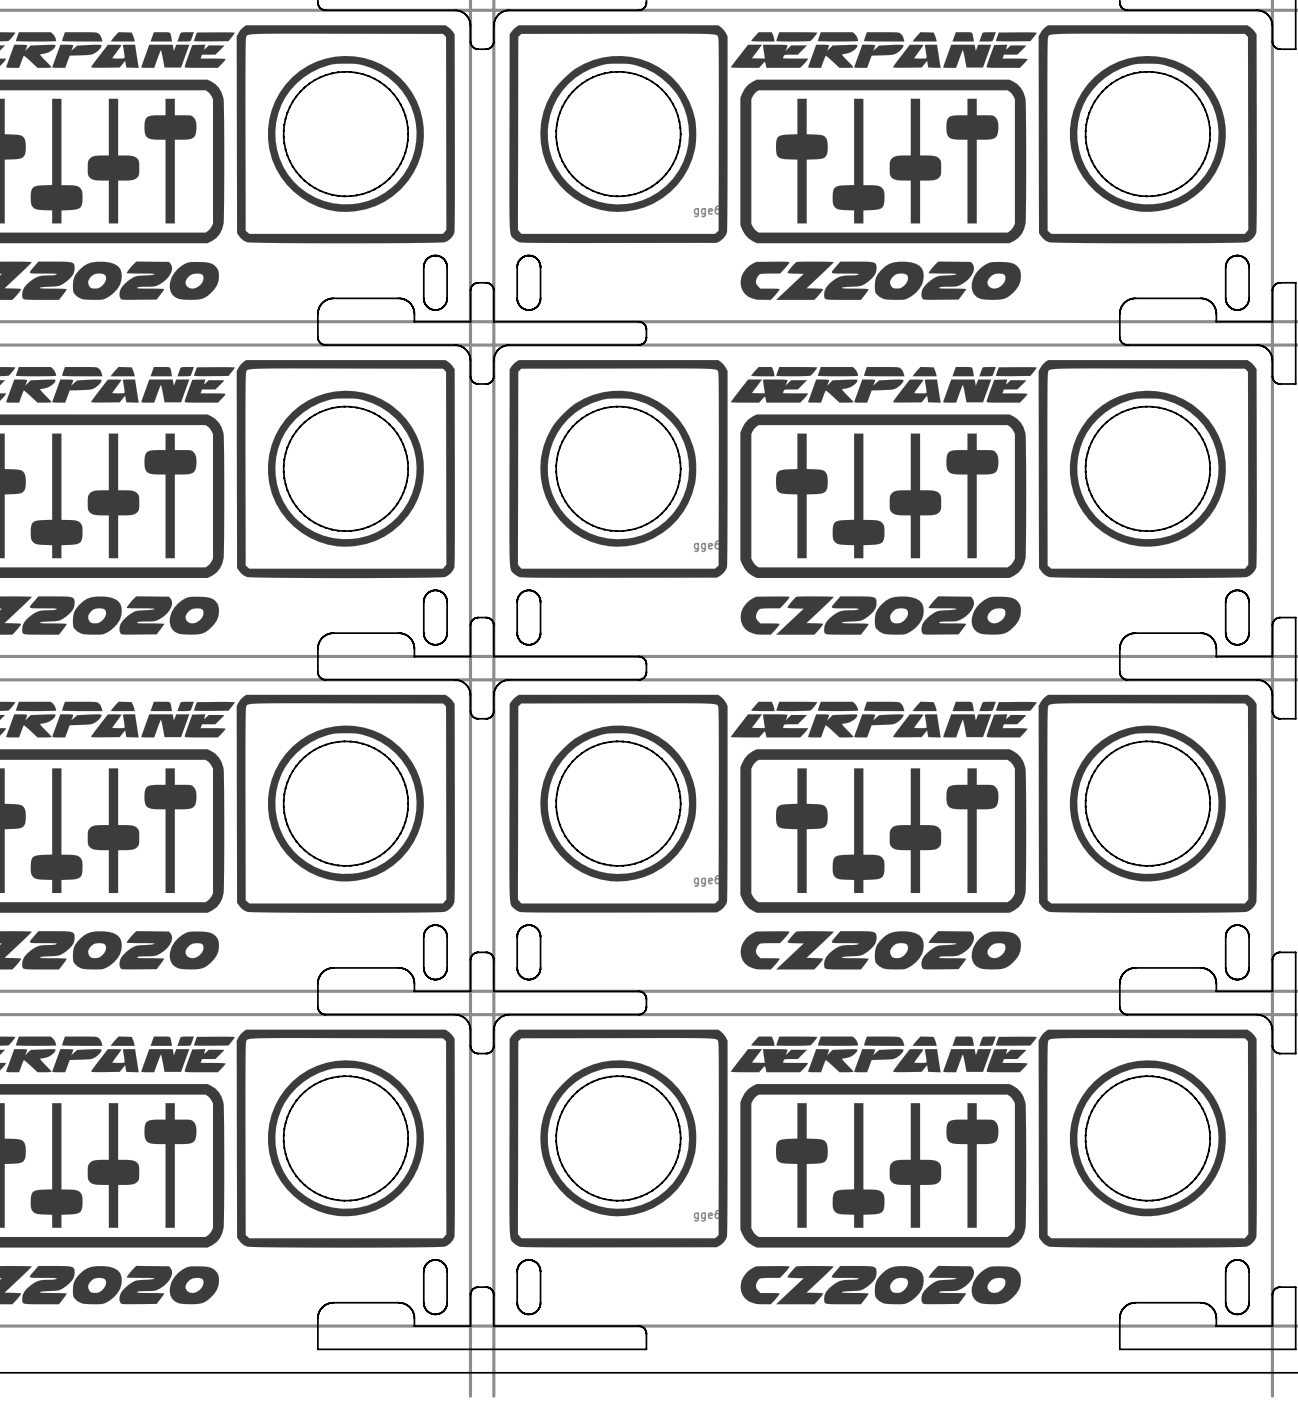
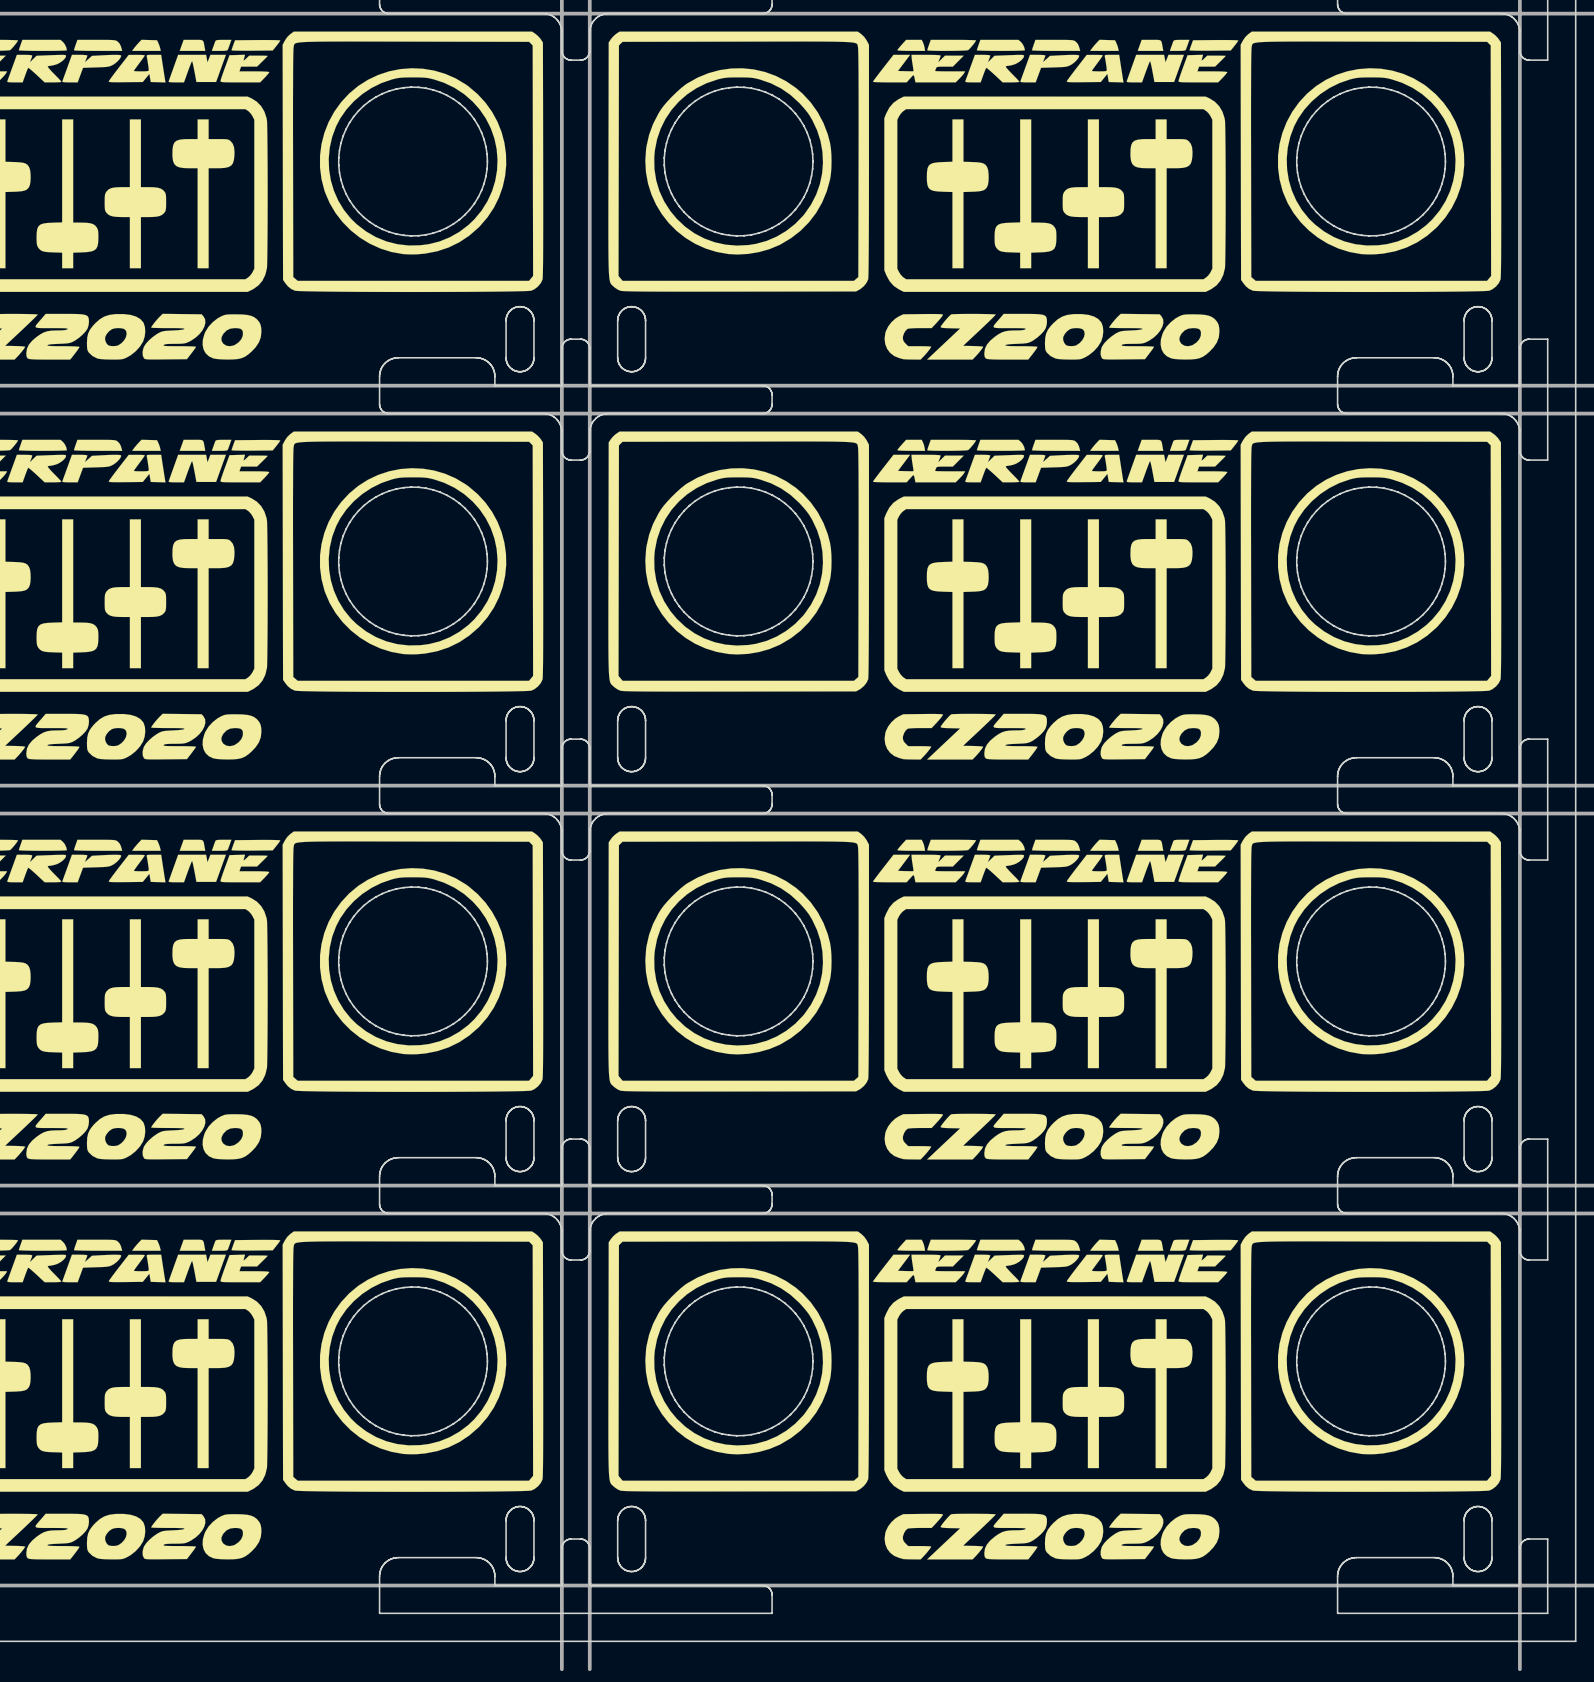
part: (707, 211) -> none
part: (707, 546) -> none
part: (707, 880) -> none
part: (707, 1215) -> none

